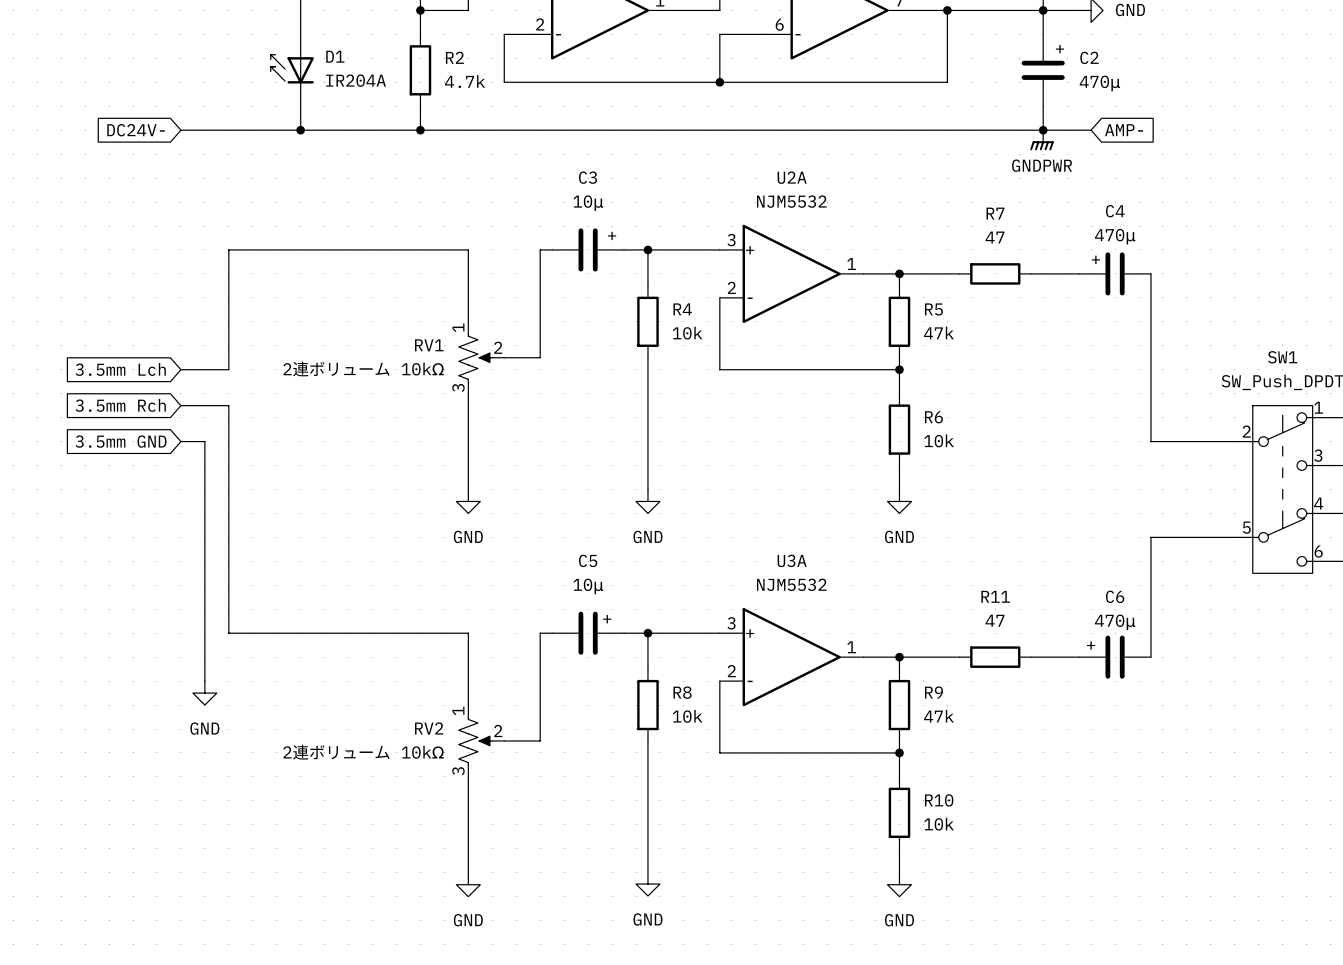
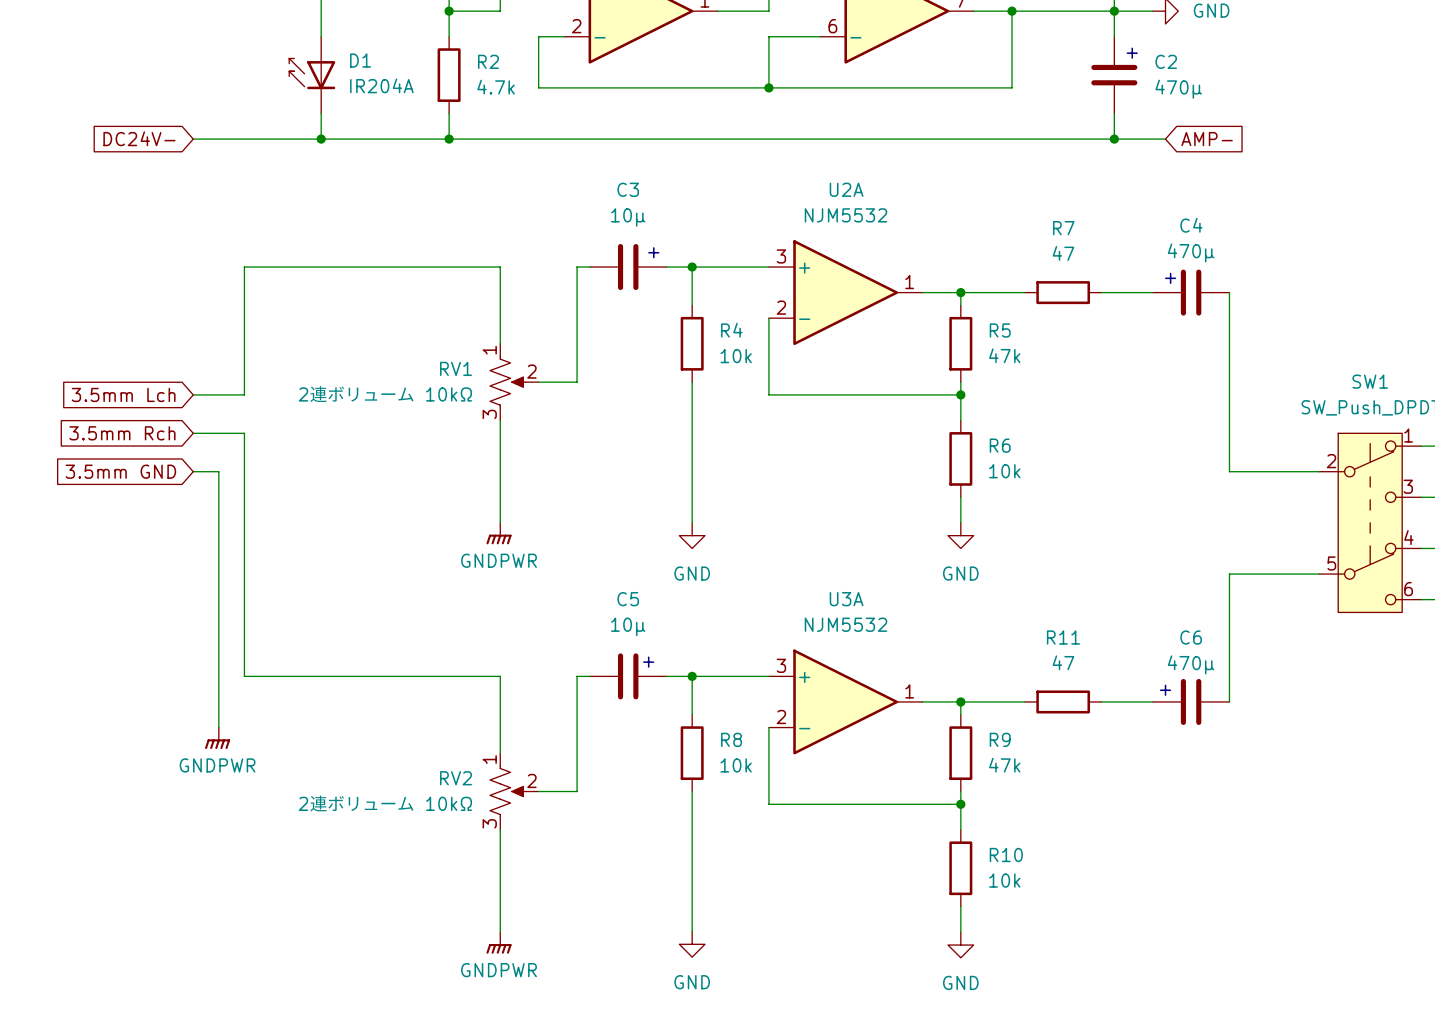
power symbol: GNDPWR (1041, 140) -> none
power symbol: GND (468, 501) -> GNDPWR (499, 533)
power symbol: GND (204, 693) -> GNDPWR (217, 738)
power symbol: GND (468, 884) -> GNDPWR (499, 942)

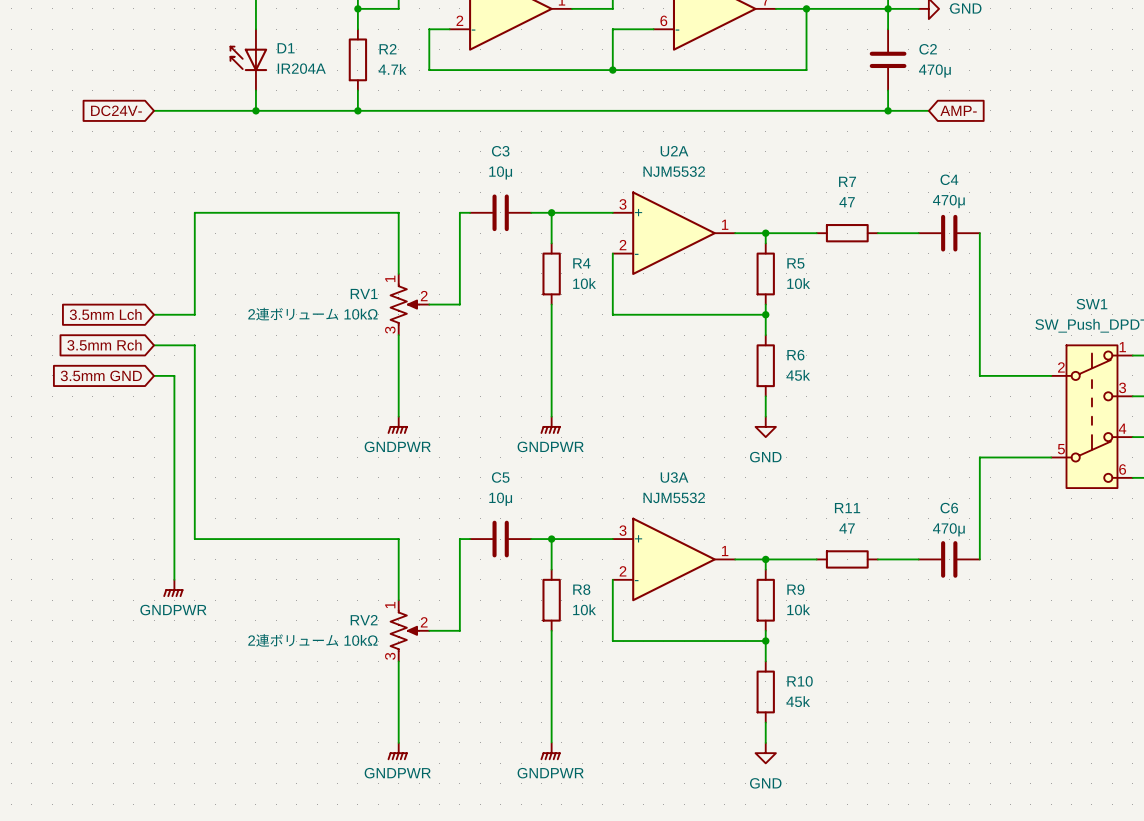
text: + (1132, 53) -> none
text: + (653, 252) -> none
text: + (1170, 278) -> none
R5 value: 47k (1004, 355) -> 10k (798, 283)
R6 value: 10k (1004, 471) -> 45k (798, 375)
power symbol: GND (692, 535) -> GNDPWR (550, 425)
text: + (648, 662) -> none
text: + (1165, 690) -> none
R9 value: 47k (1004, 765) -> 10k (798, 609)
R10 value: 10k (1004, 880) -> 45k (798, 701)
power symbol: GND (692, 944) -> GNDPWR (550, 751)

